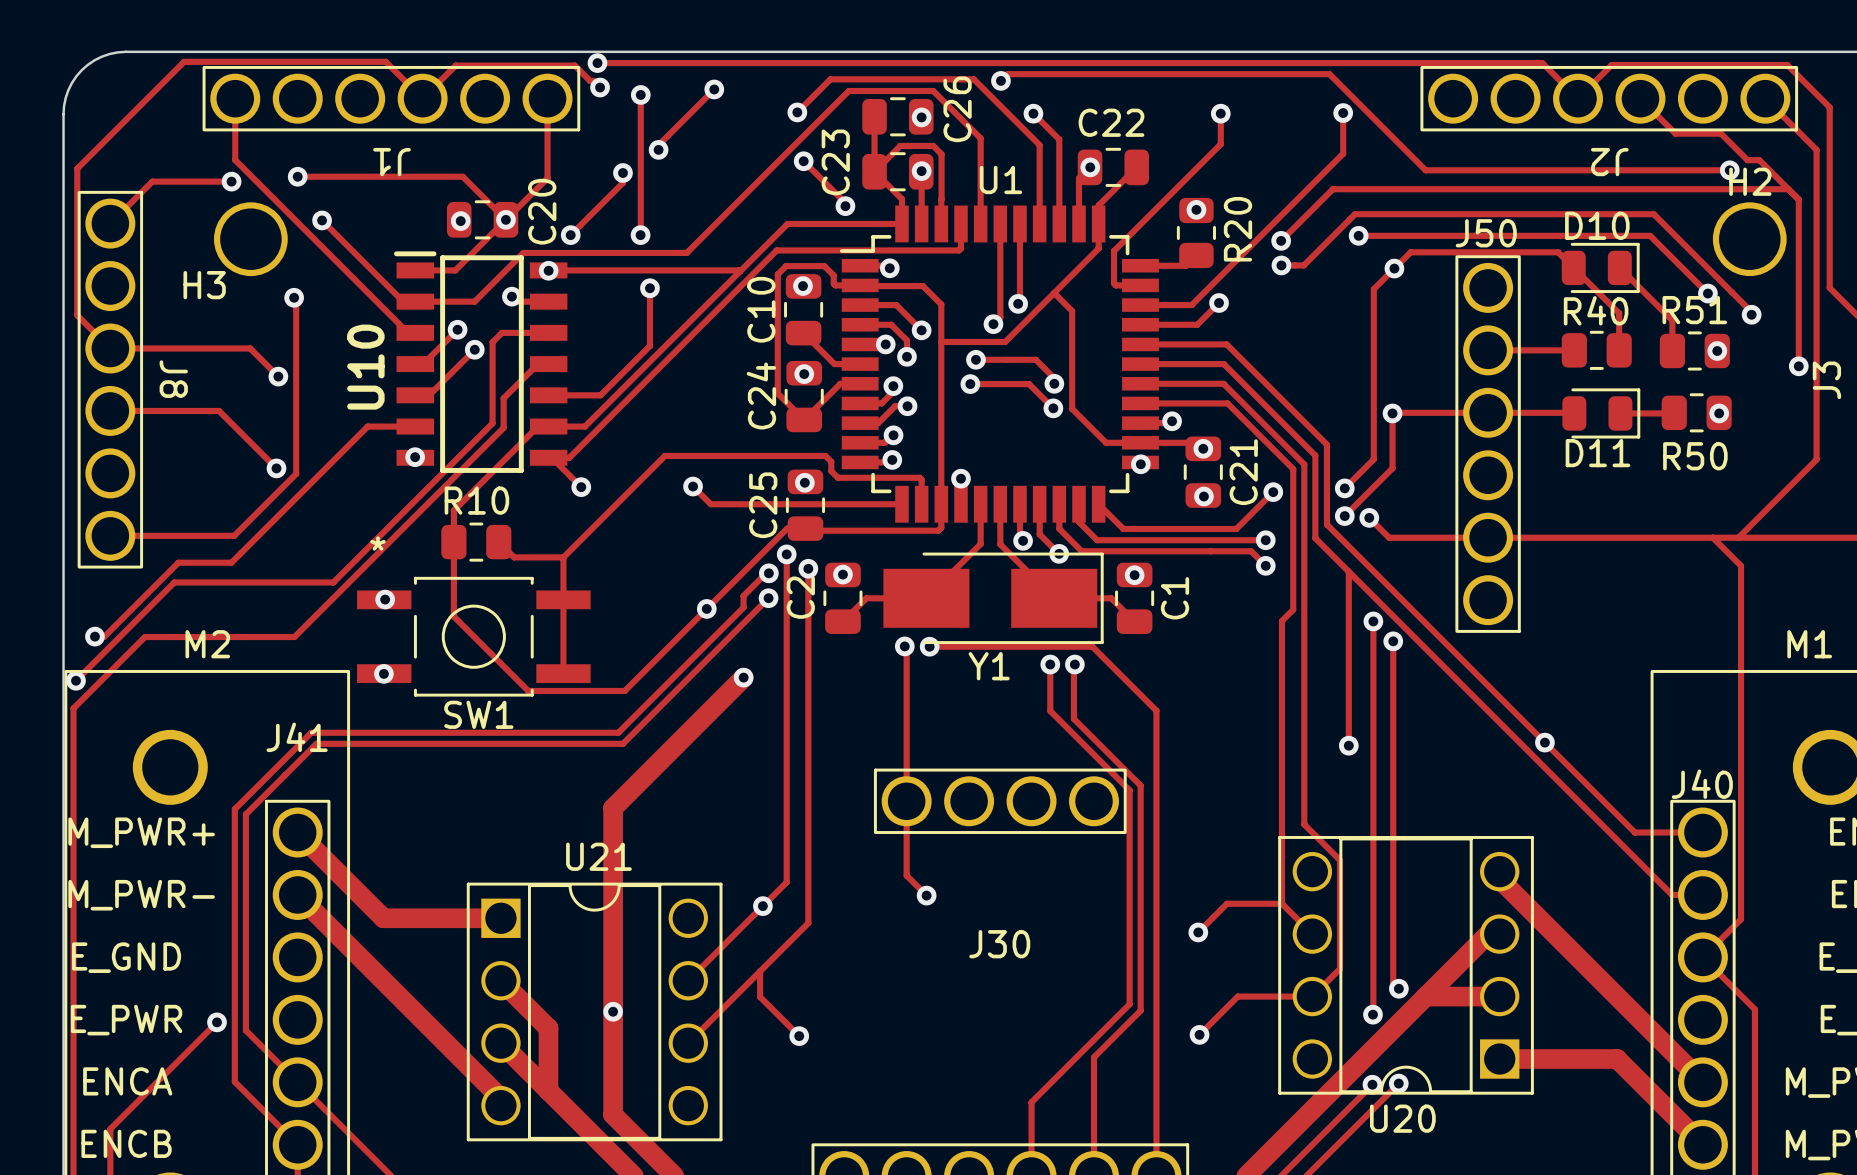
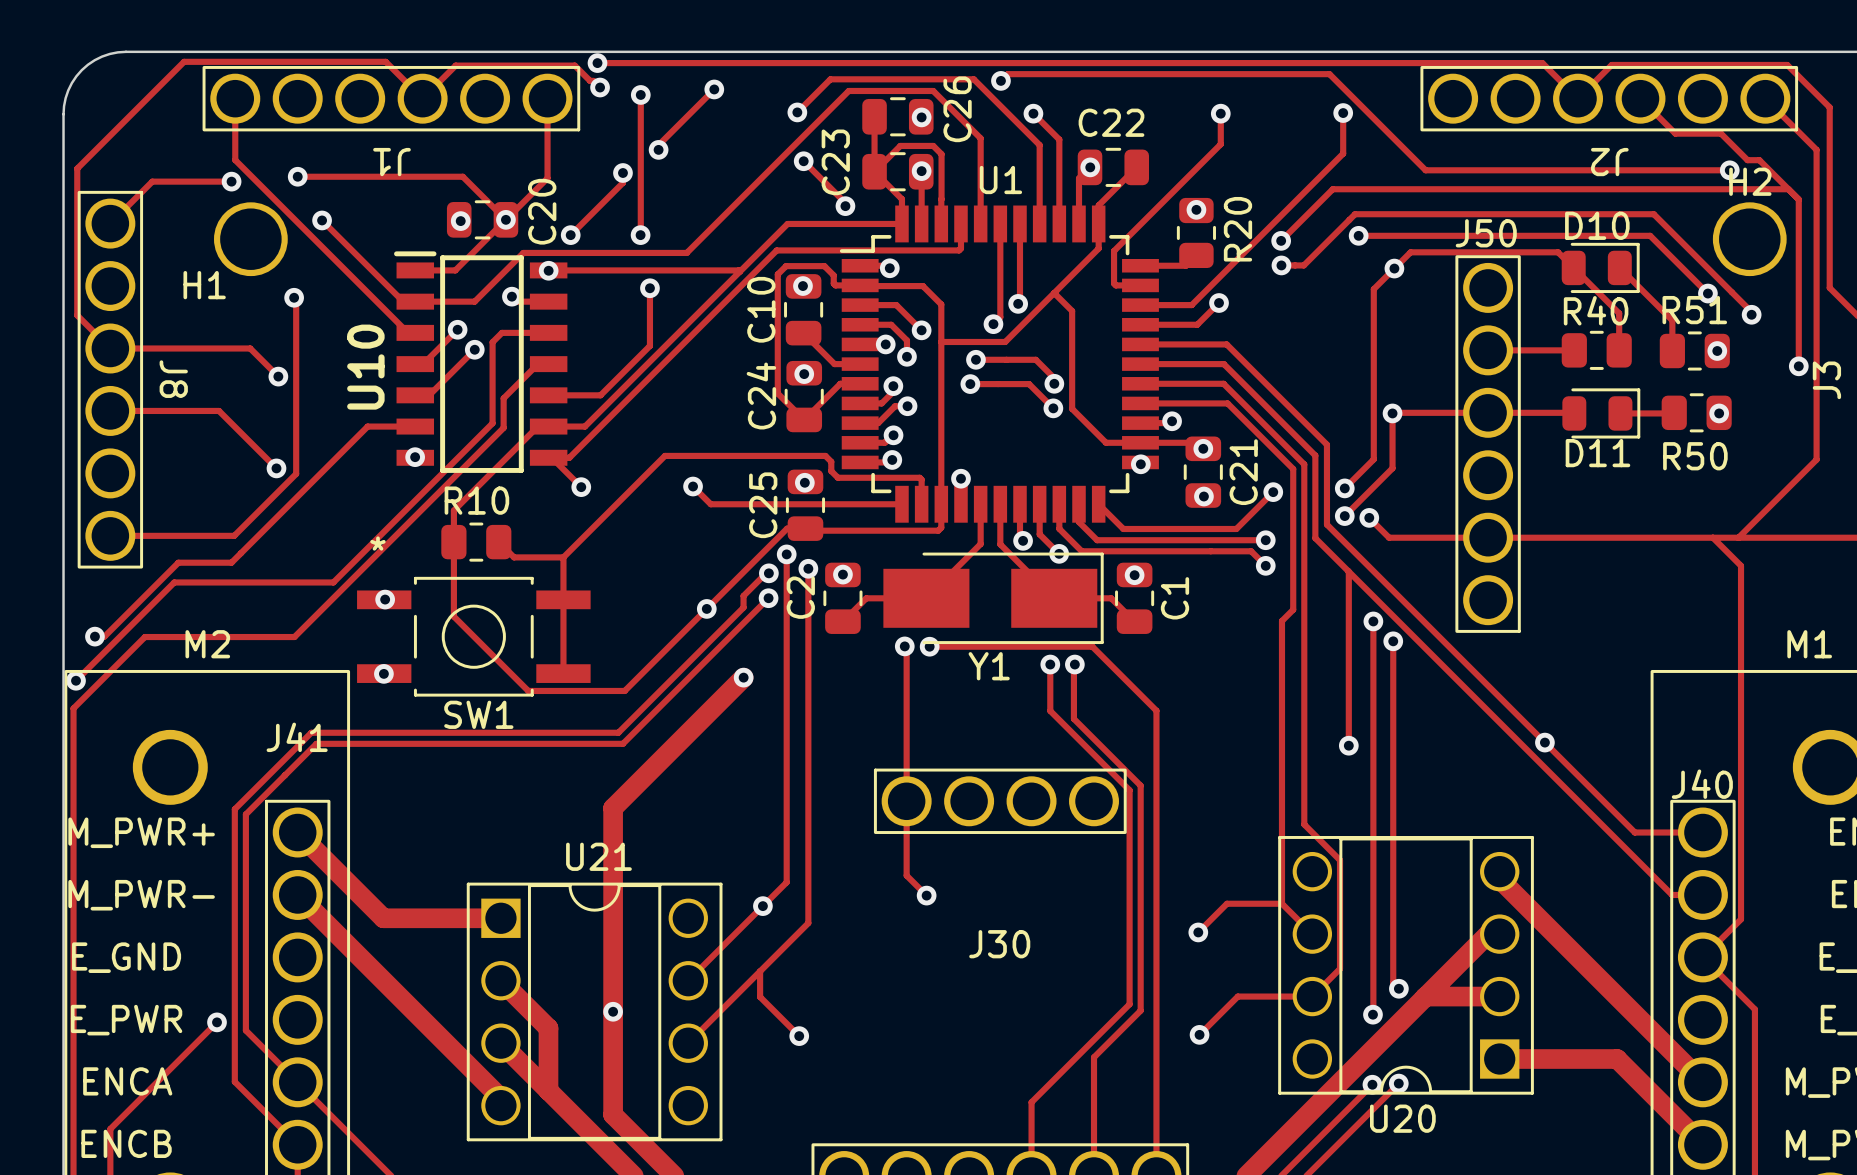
H3 name: H3 (204, 285) -> H1 (204, 285)

